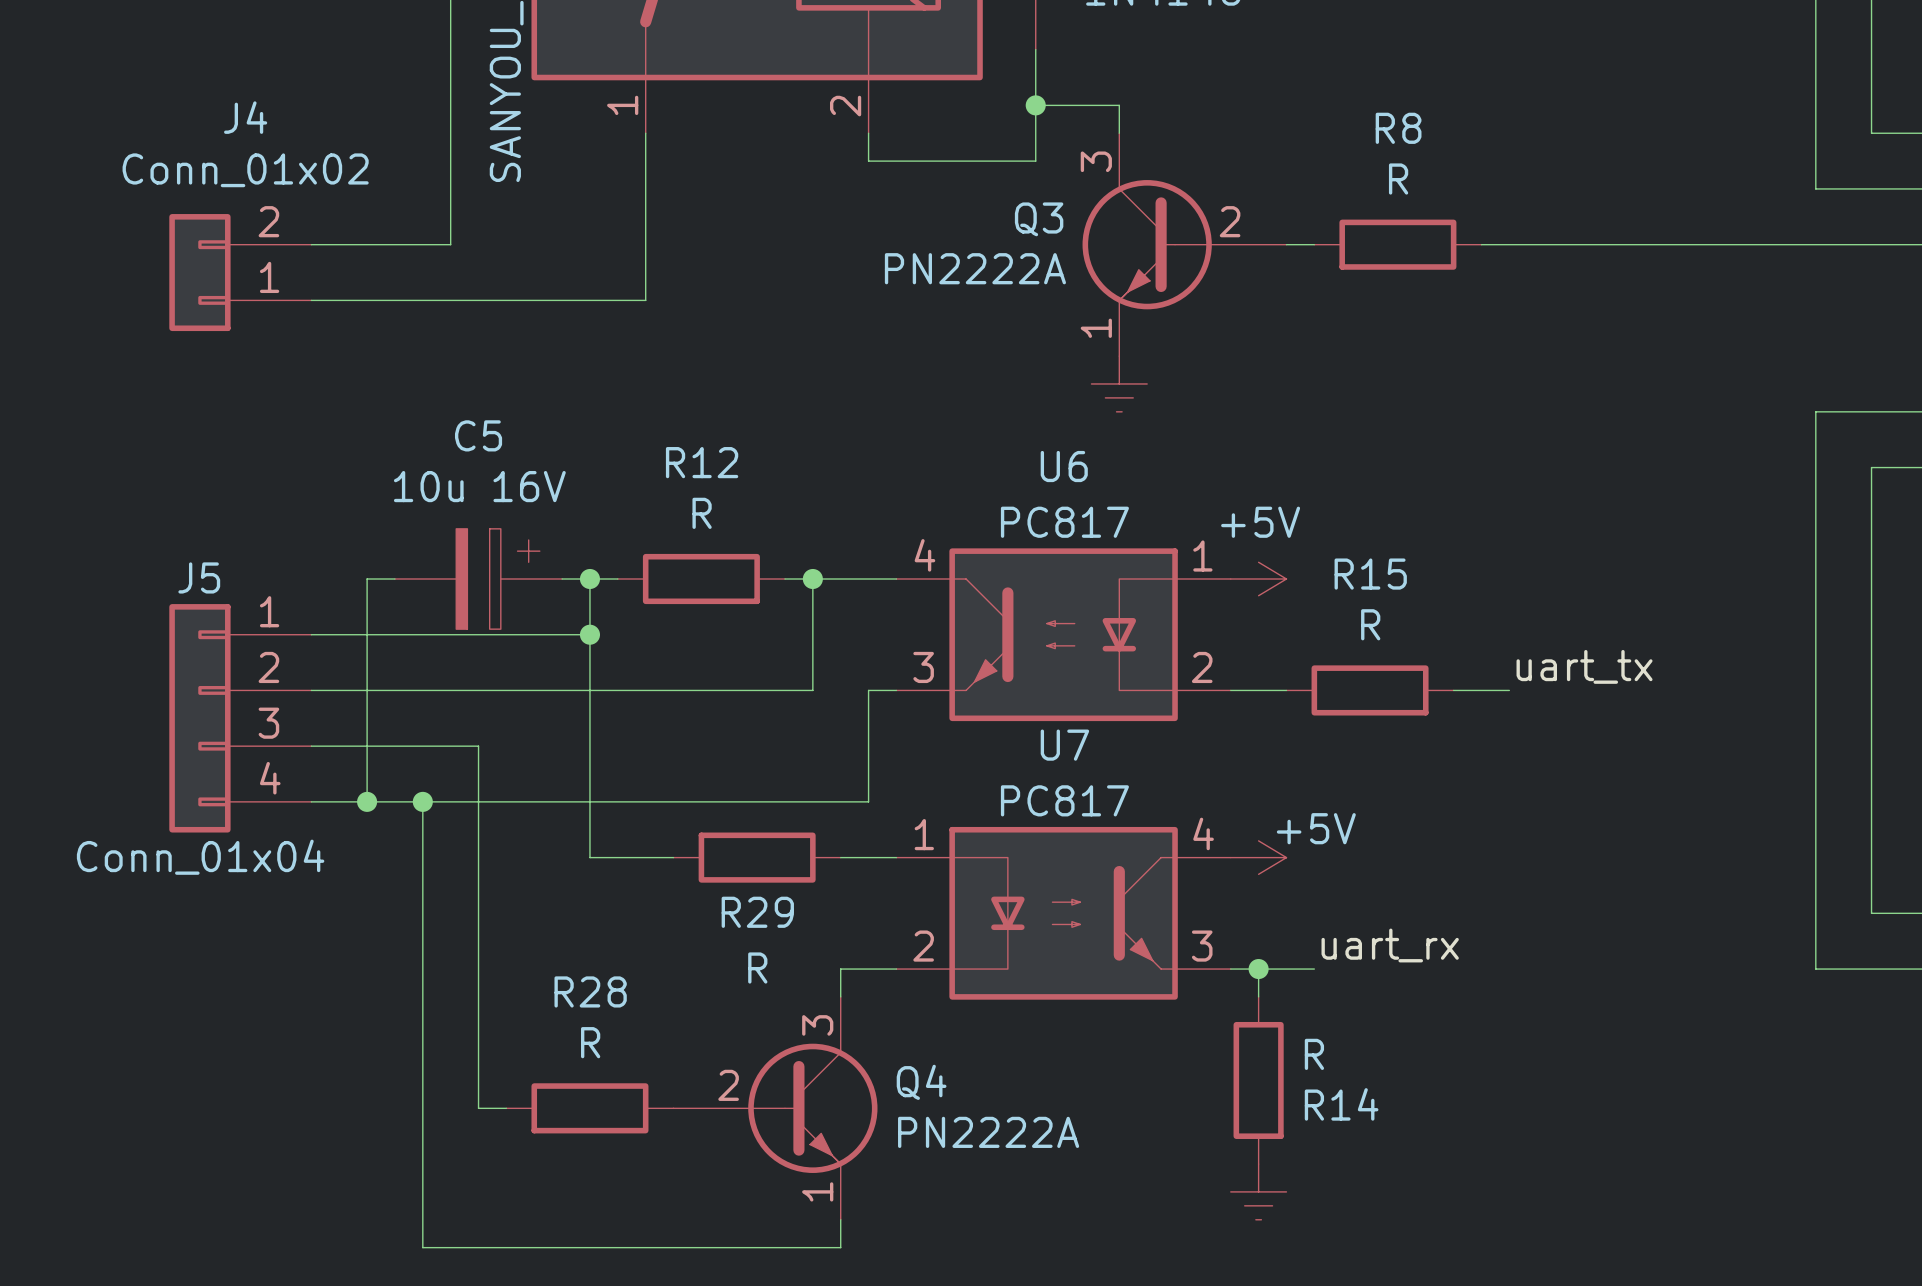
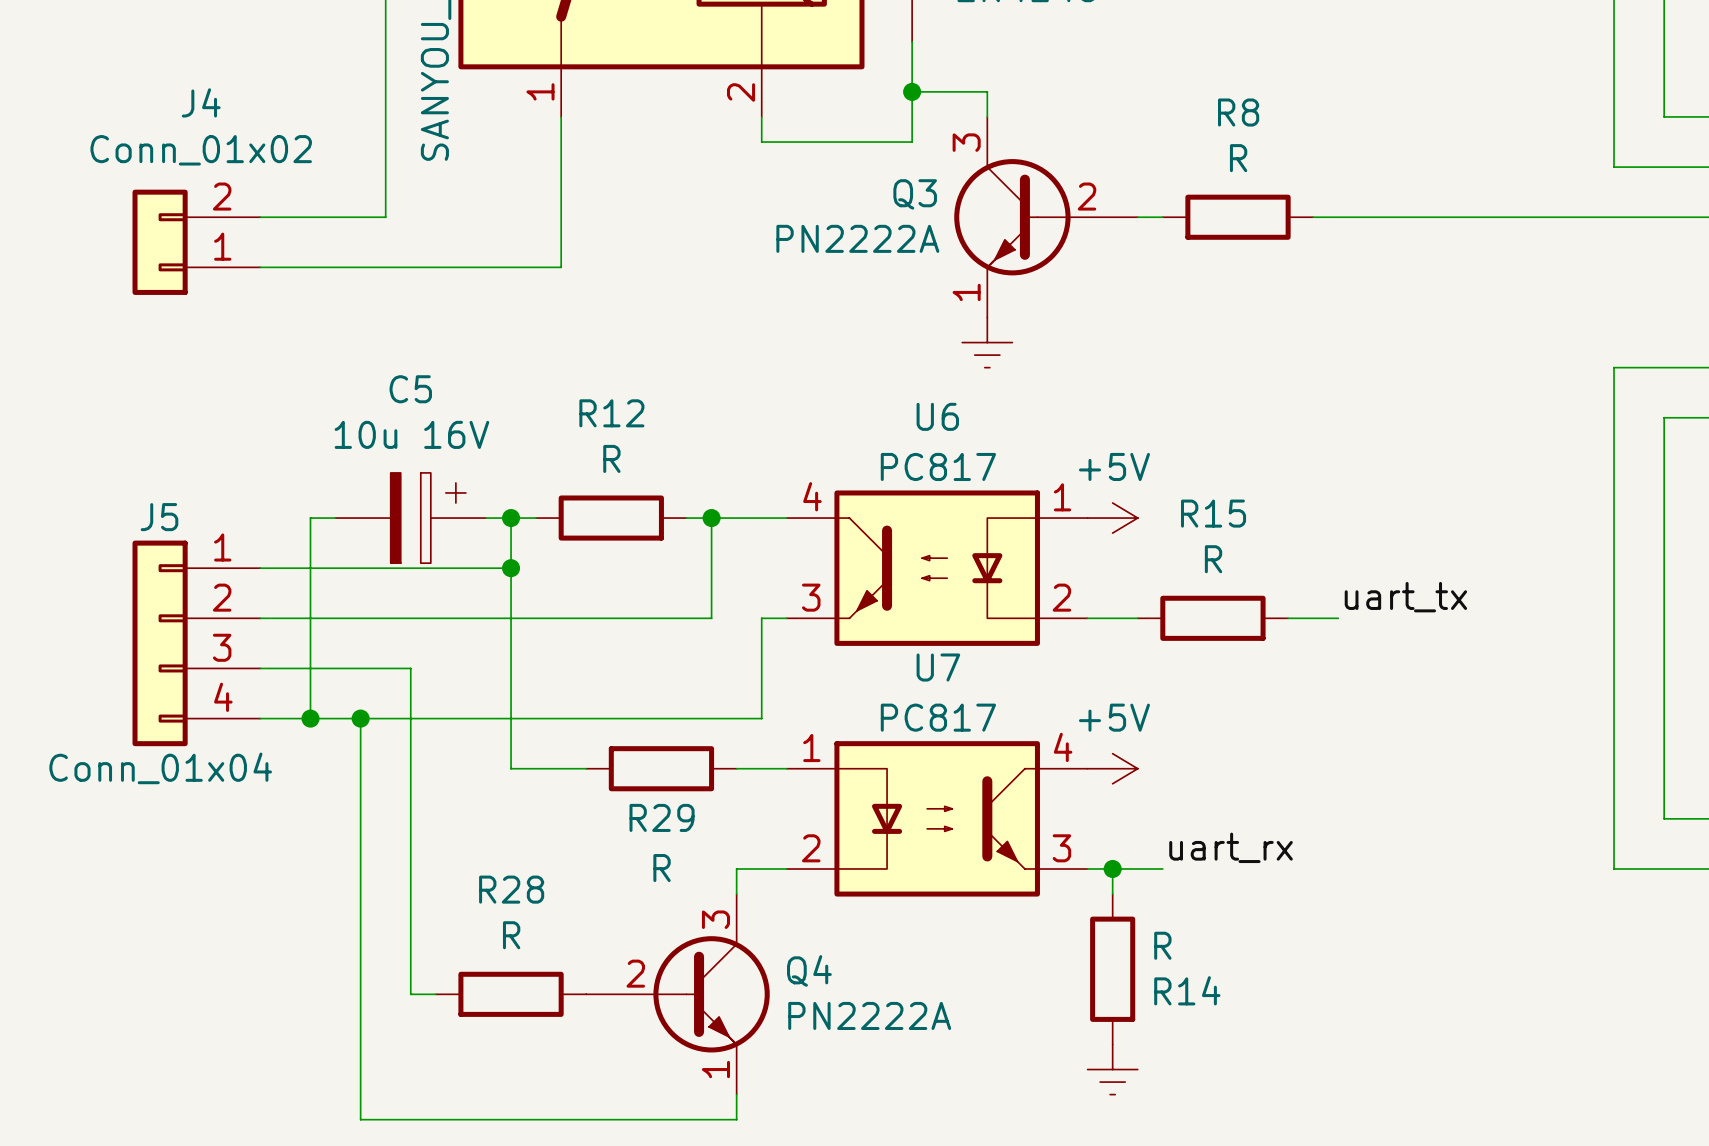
power symbol text position: +5V (1316, 828) -> +5V (1114, 717)

